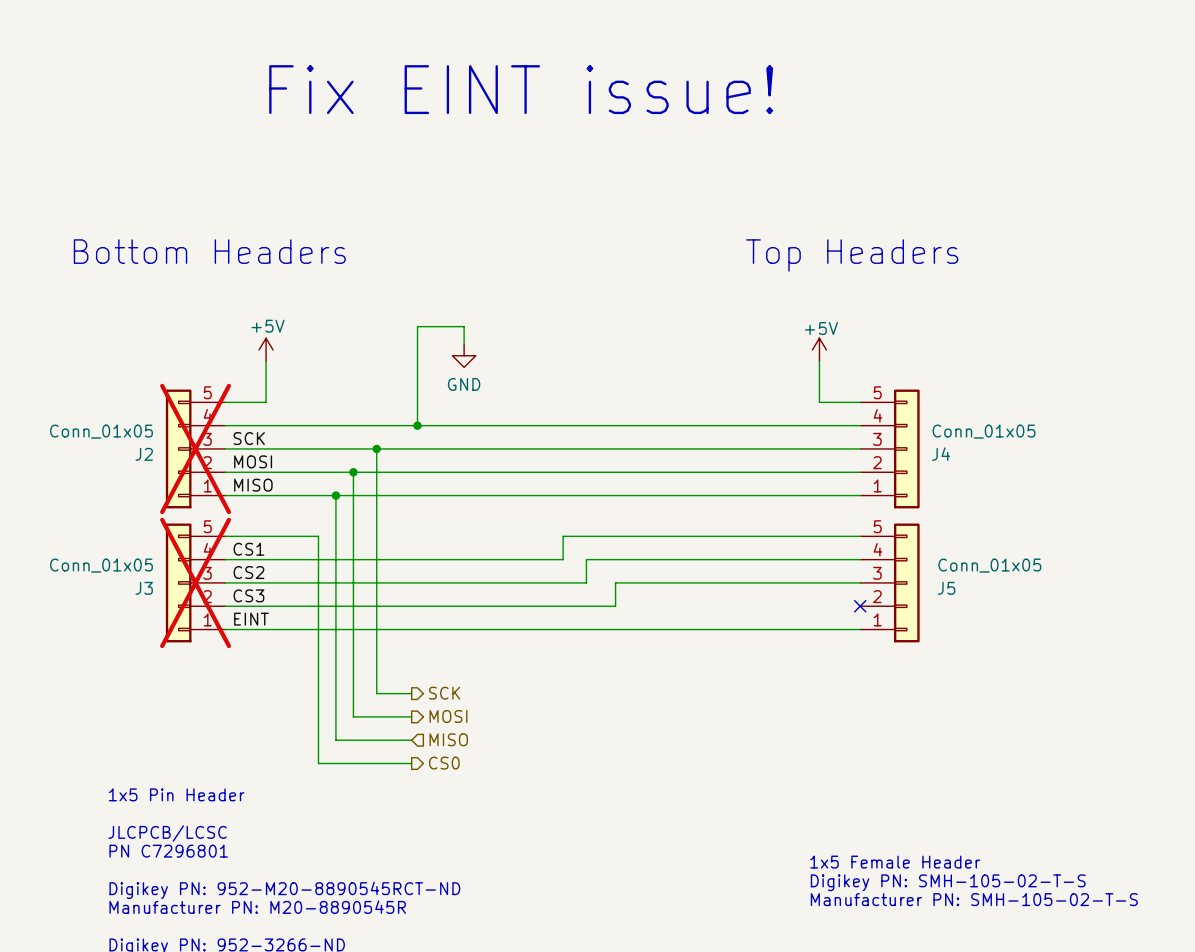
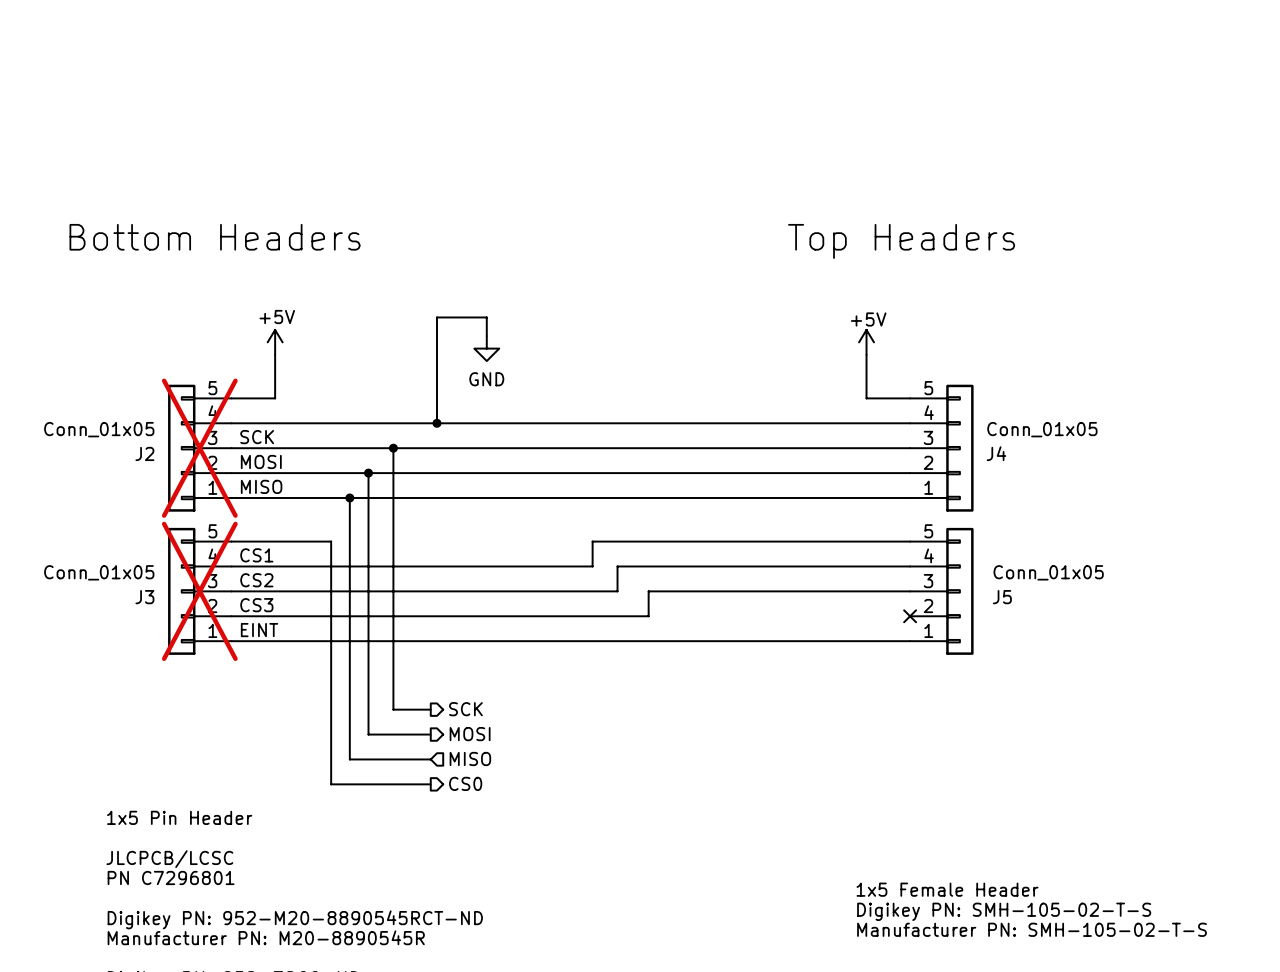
text: Fix EINT issue! (521, 89) -> none

